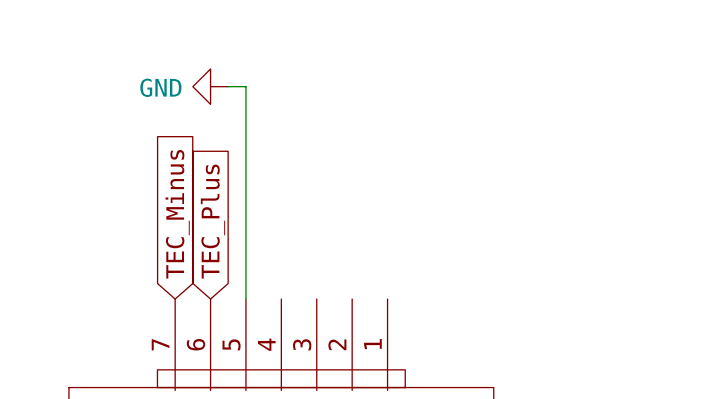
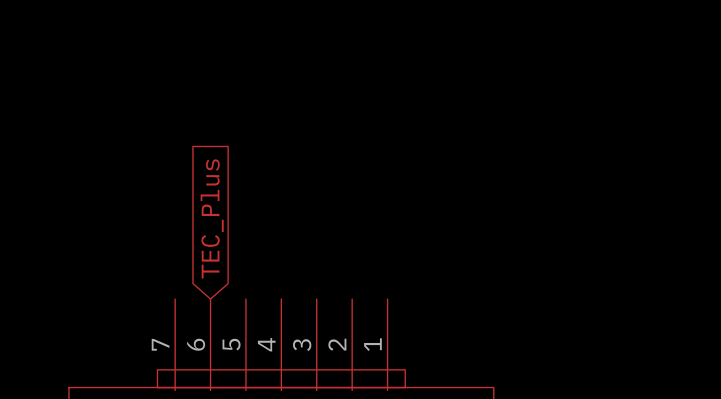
power symbol: GND (210, 86) -> none
wire: (228, 86) (245, 86) (245, 299) -> none
global label: TEC_Minus (177, 214) -> none

